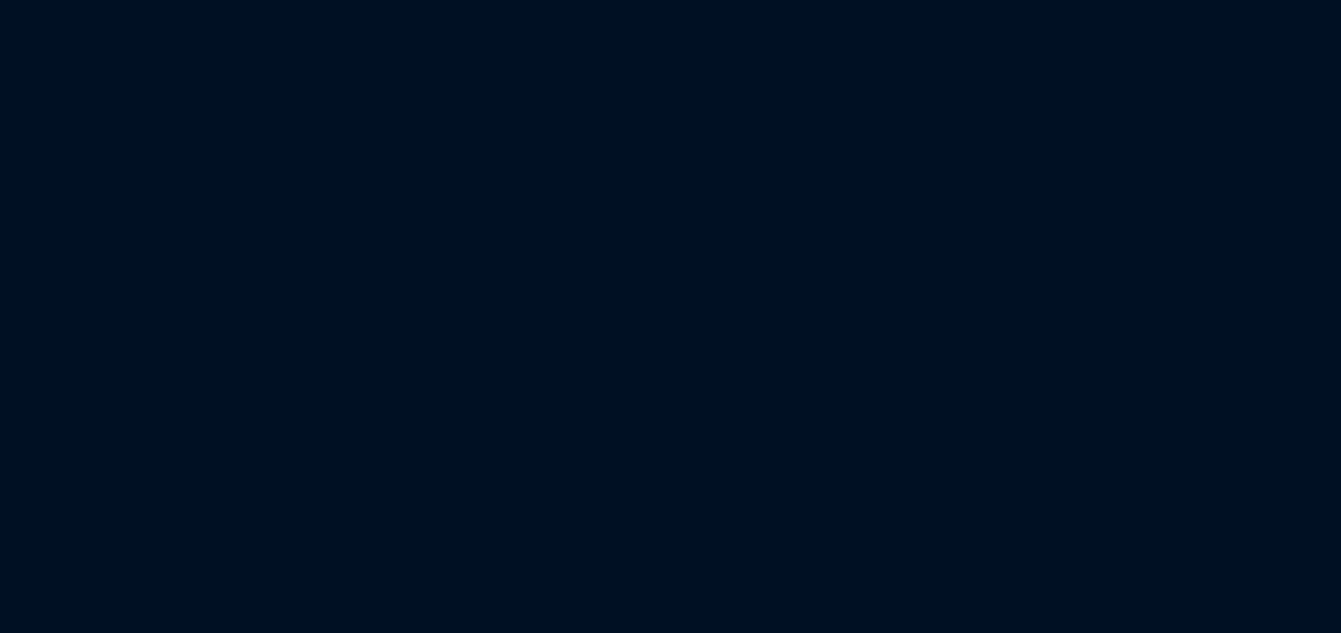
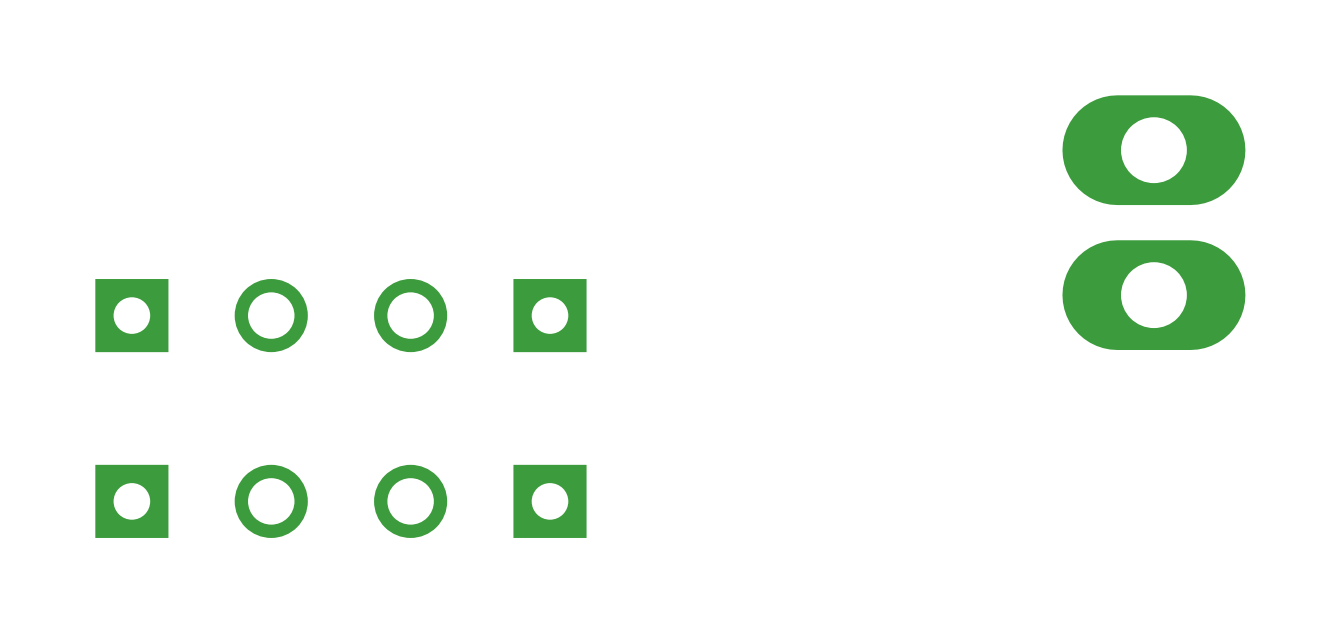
part: none -> (1153, 222)
part: none -> (201, 315)
part: none -> (480, 315)
part: none -> (201, 501)
part: none -> (480, 501)

